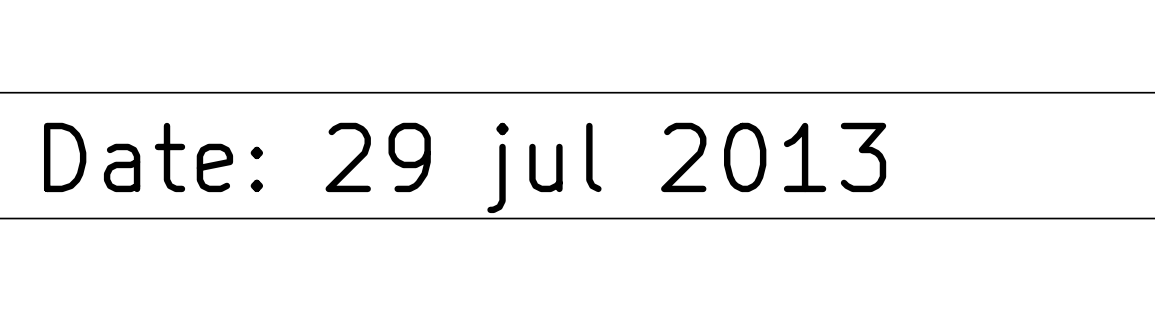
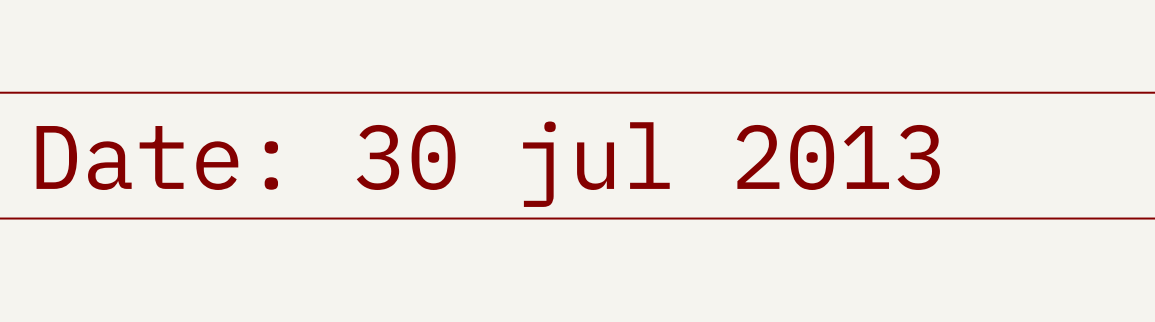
title block: Date: 29 jul 2013 (465, 167) -> Date: 30 jul 2013 (488, 164)

